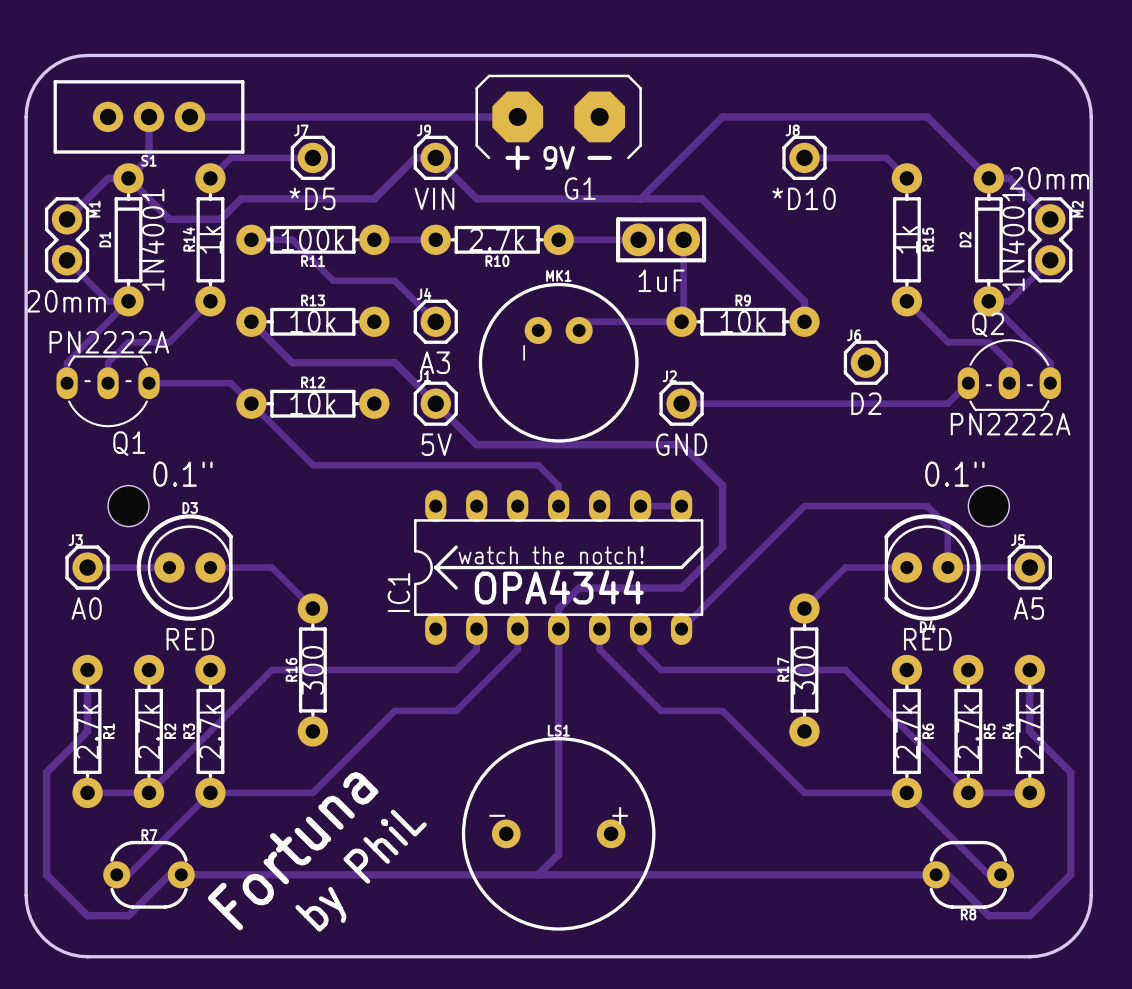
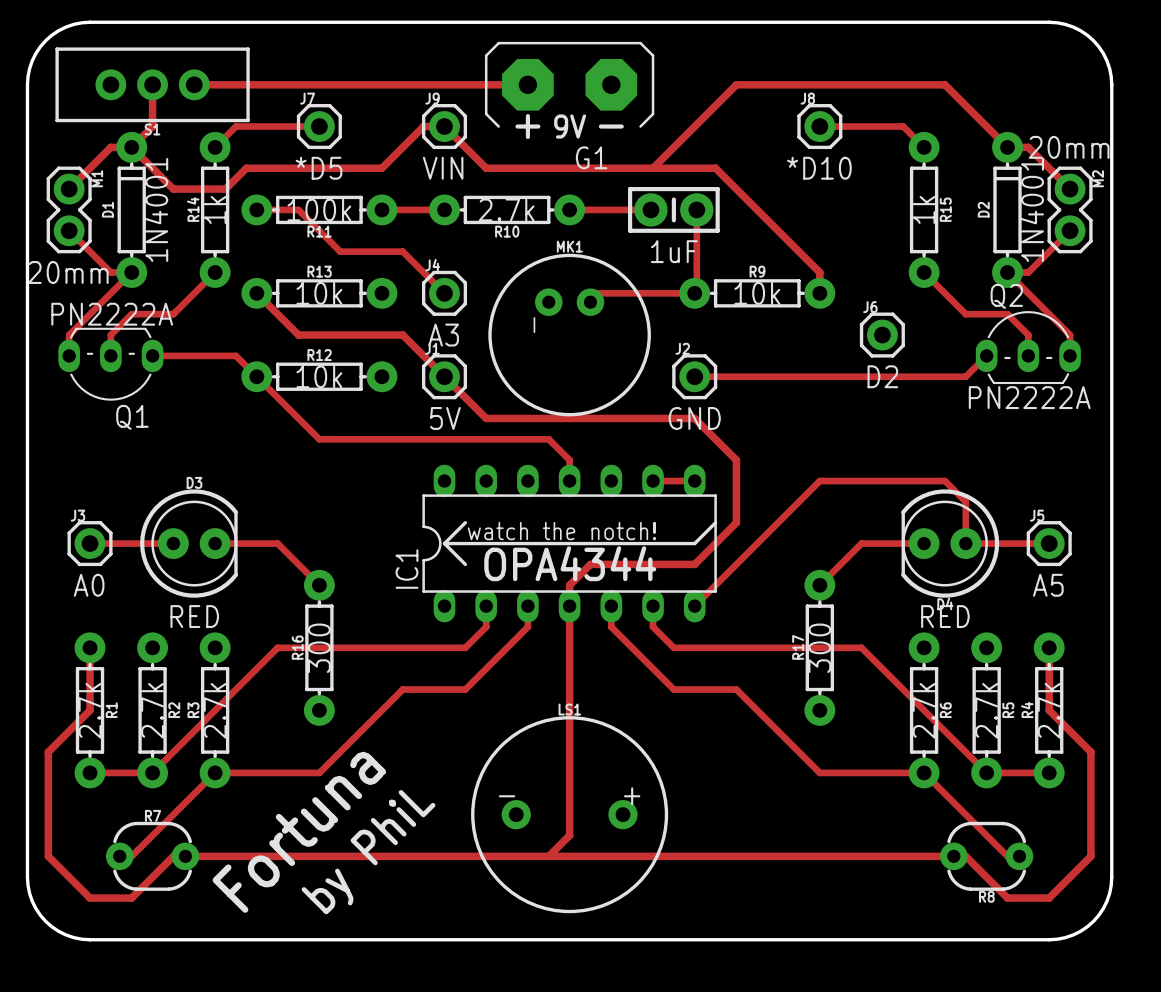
text: 0.1" (182, 474) -> none
text: 0.1" (954, 474) -> none
hole: (128, 506) -> none
hole: (988, 506) -> none

